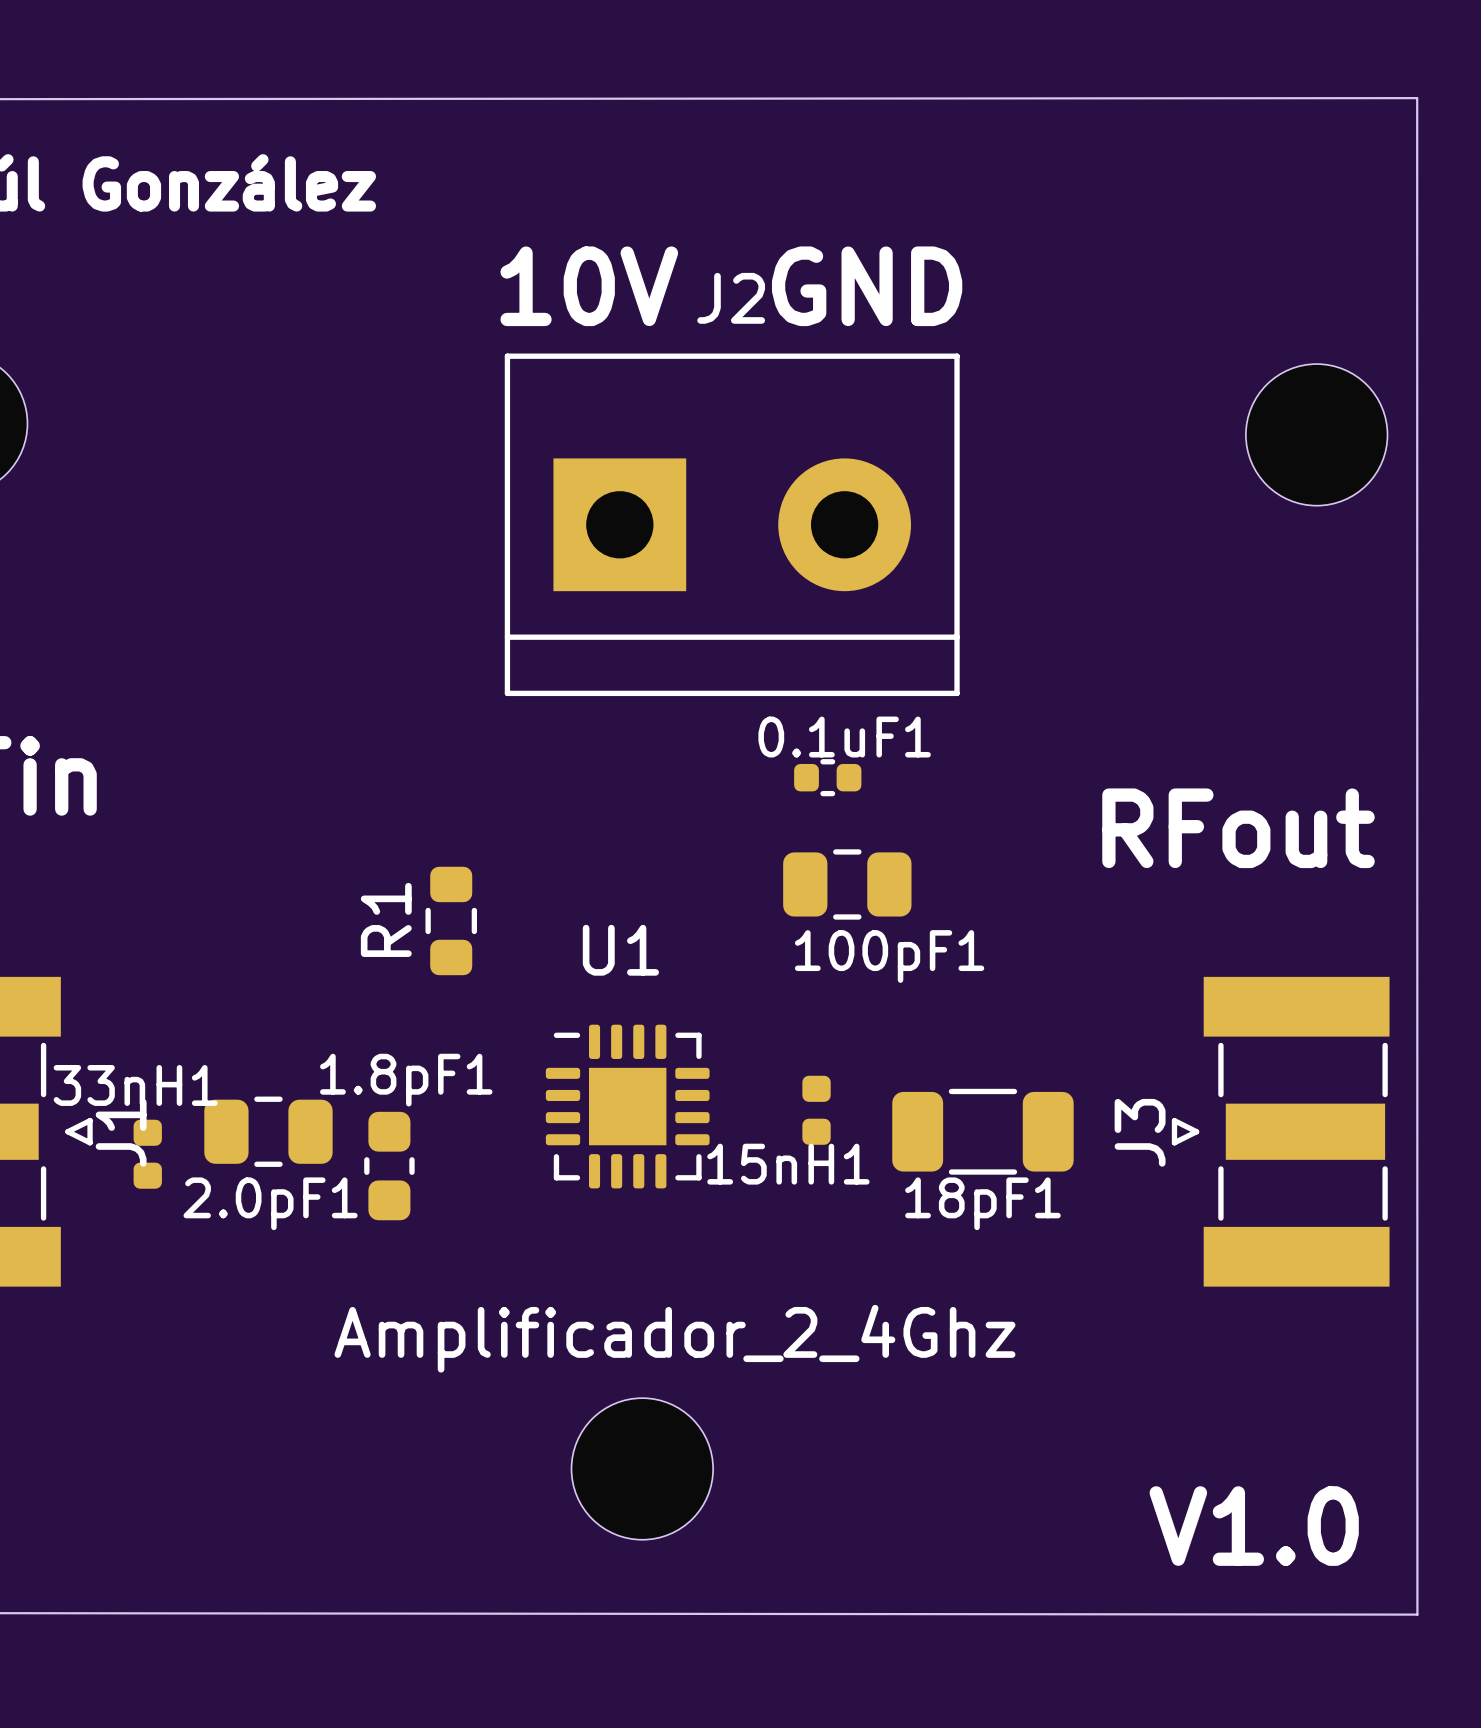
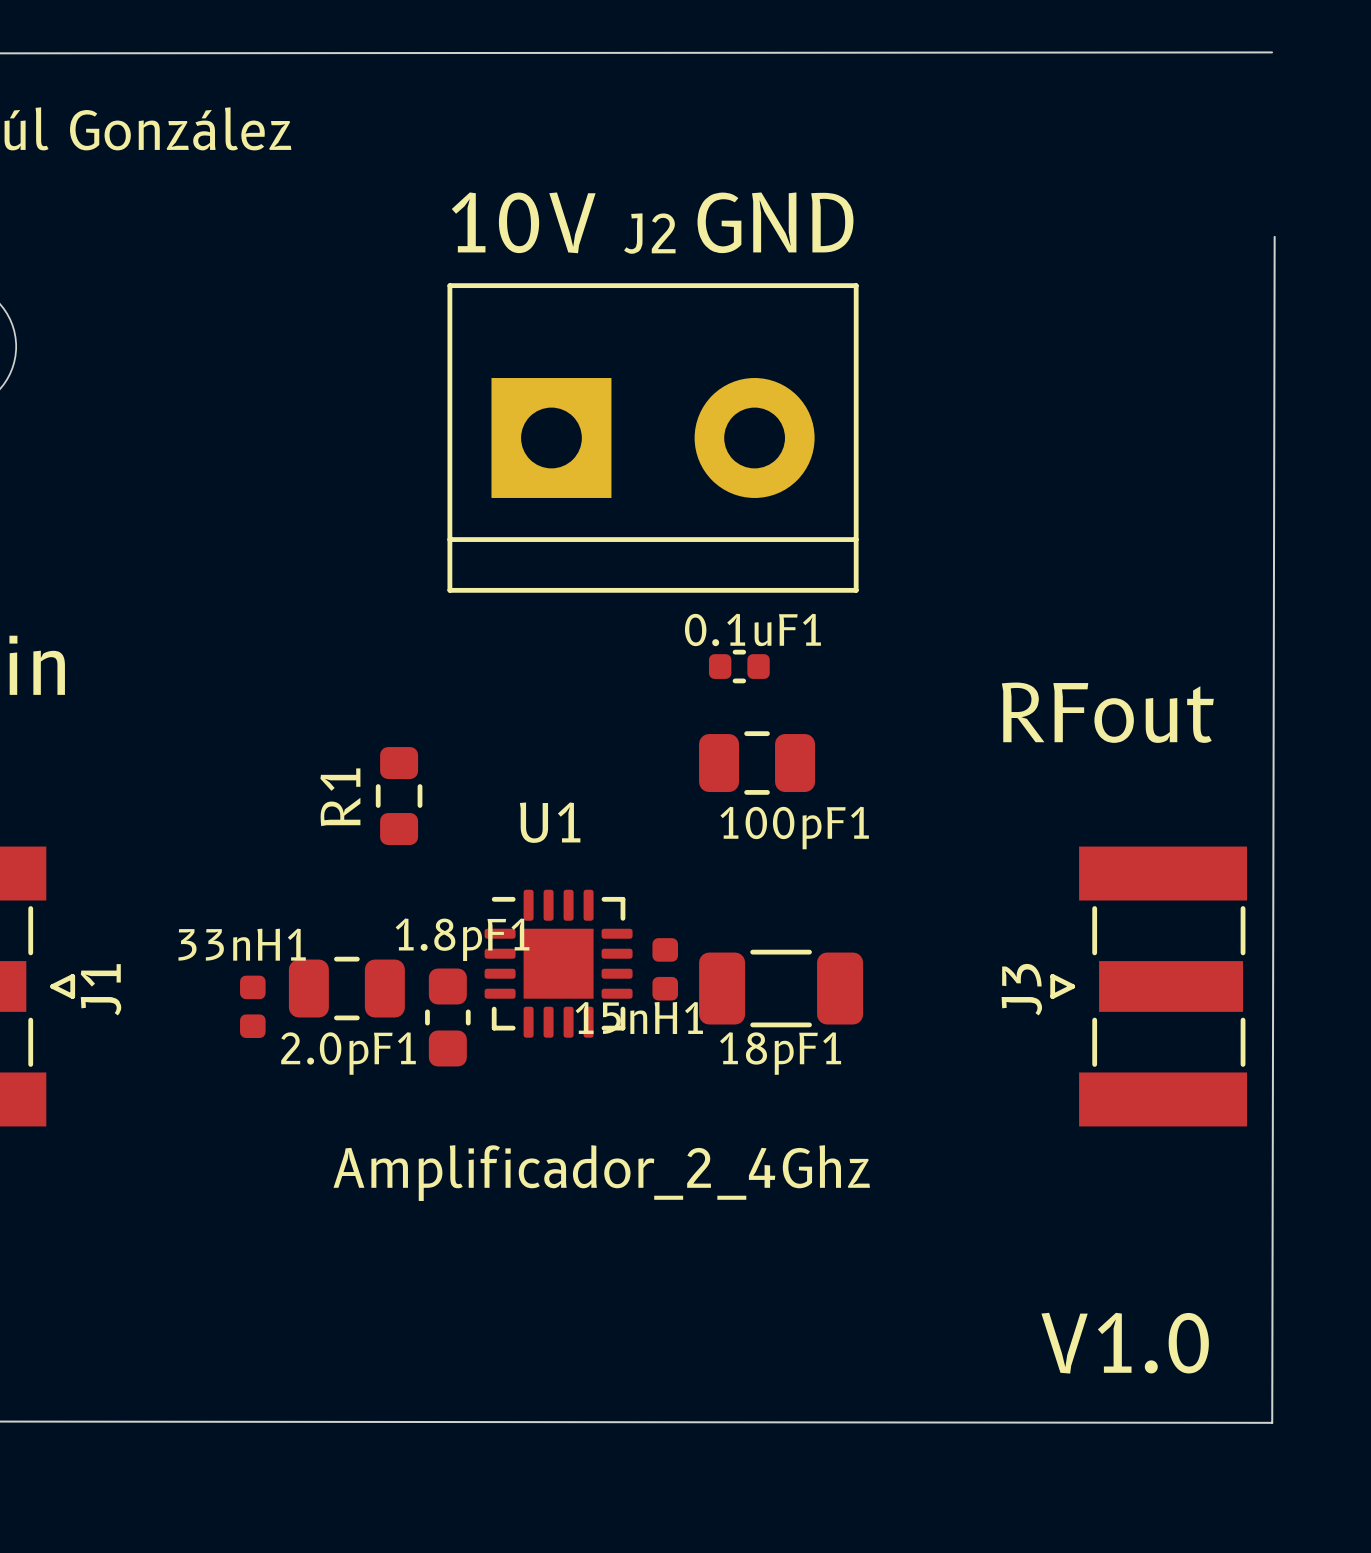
board edge: (1417, 98) (1417, 1614) -> (1274, 236) (1272, 1422)
part: (1316, 434) -> none
15nH1 position: (816, 1110) -> (665, 969)
2.0pF1 position: (268, 1131) -> (346, 988)
18pF1 position: (982, 1131) -> (781, 988)
33nH1 position: (147, 1154) -> (252, 1006)
1.8pF1 position: (389, 1166) -> (447, 1017)
part: (642, 1468) -> none

